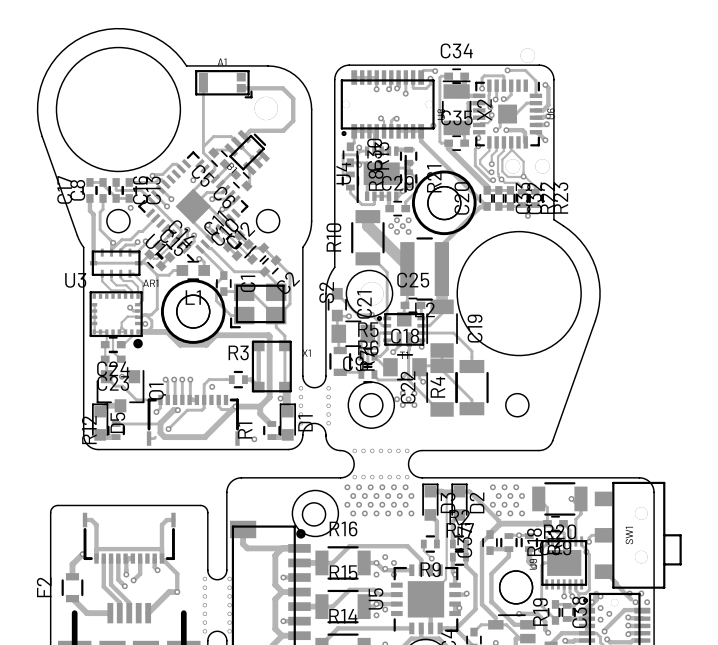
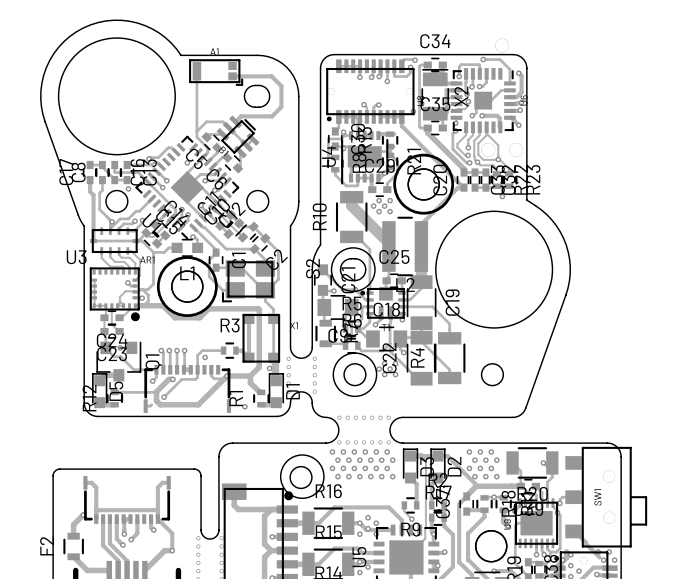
board edge: none -> (255, 85) (264, 86) (269, 93) (268, 101) (261, 106) (251, 106) (244, 99) (246, 89) (255, 85)
board edge: none -> (351, 258) (360, 260) (365, 266) (364, 275) (357, 280) (347, 279) (340, 272) (342, 263) (351, 258)

